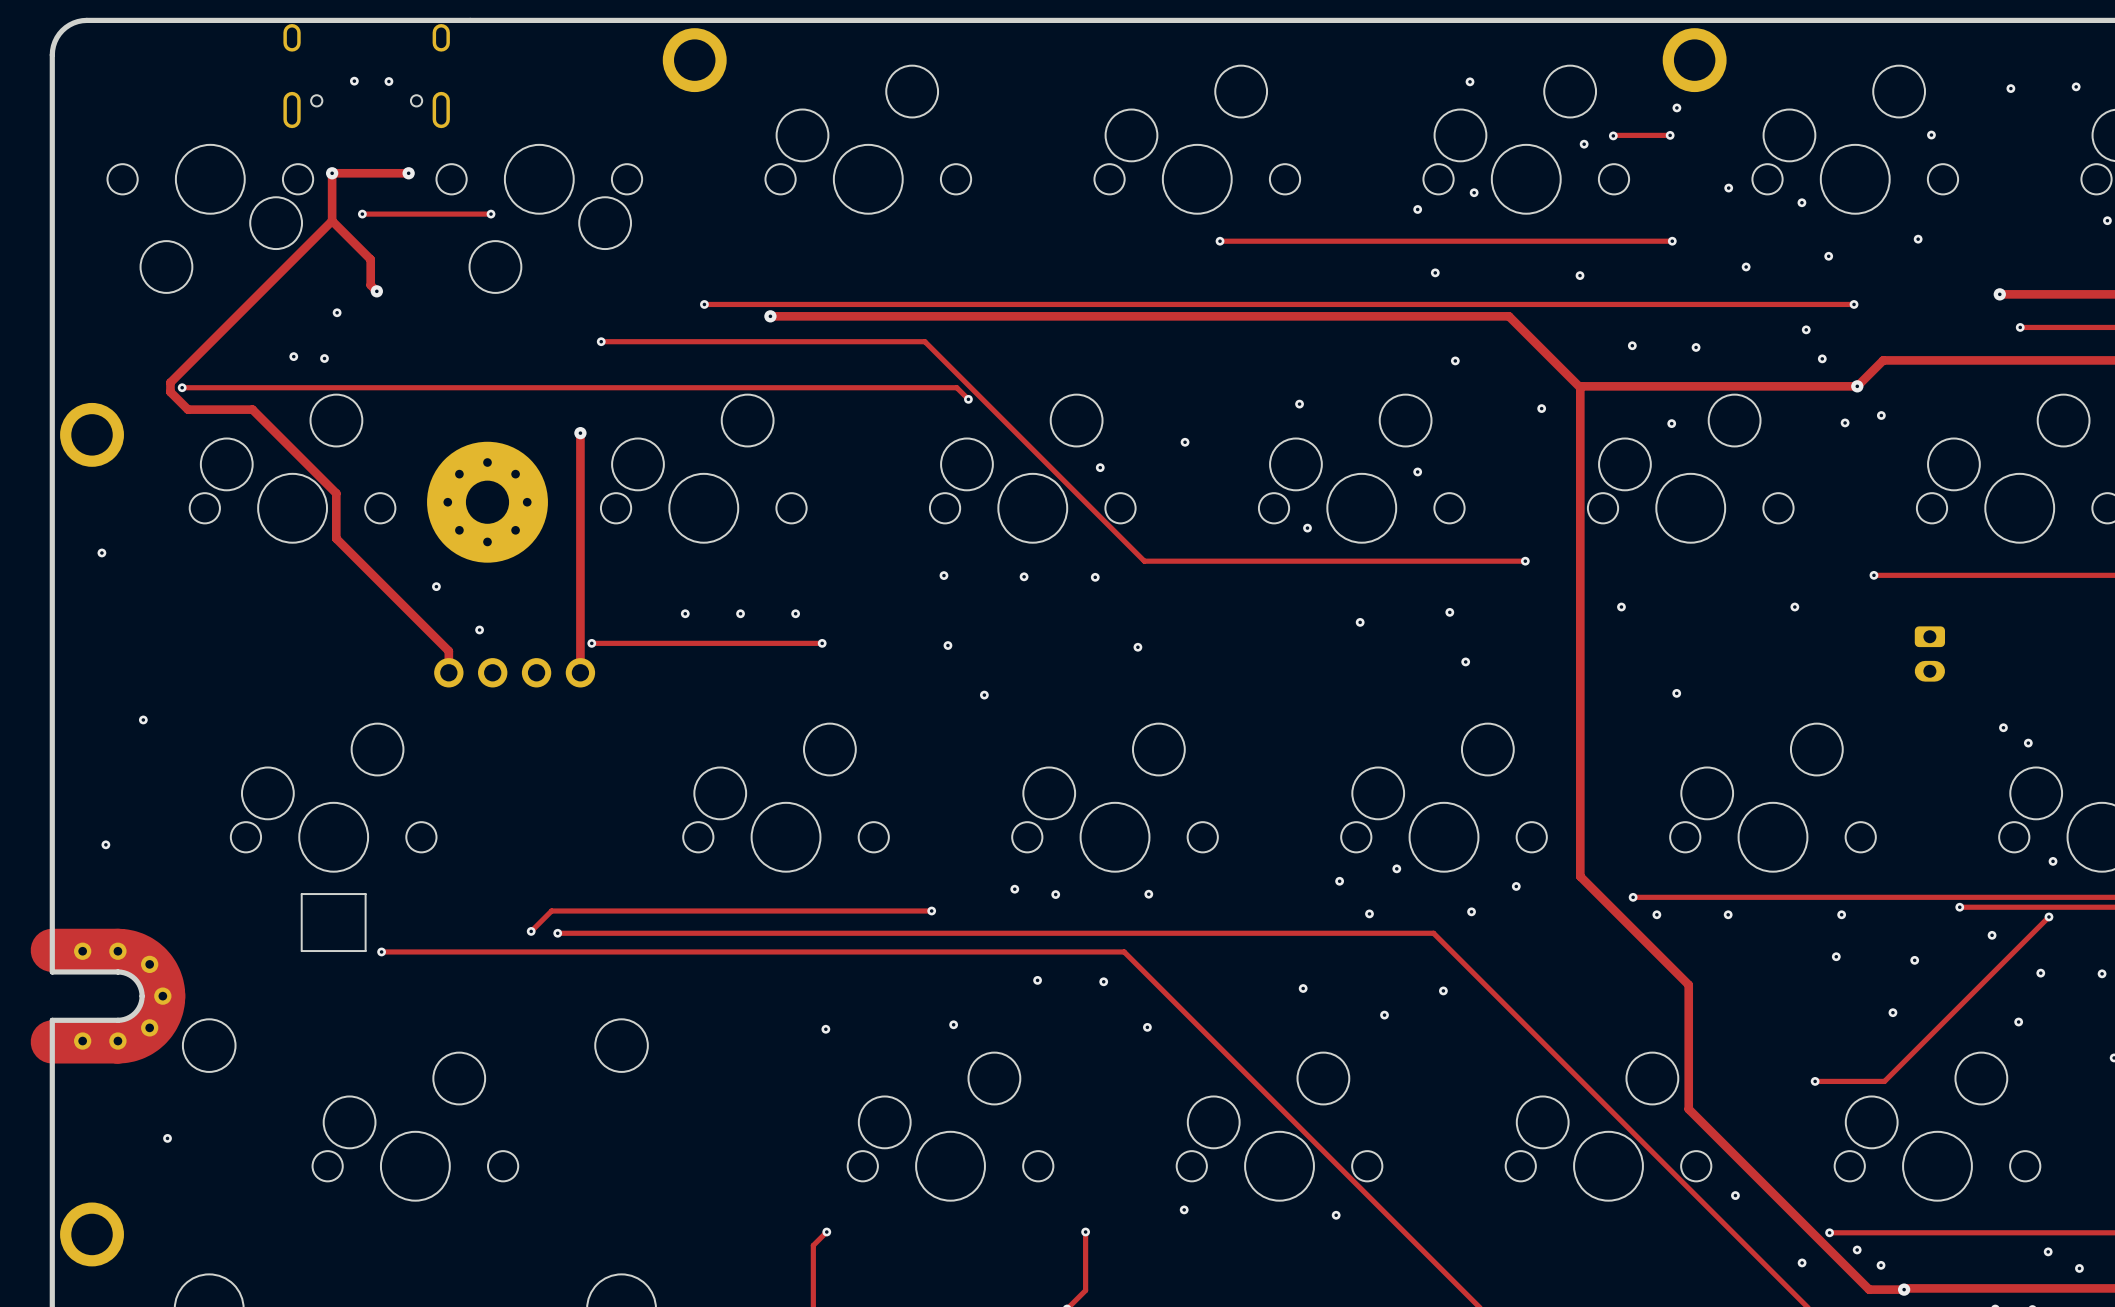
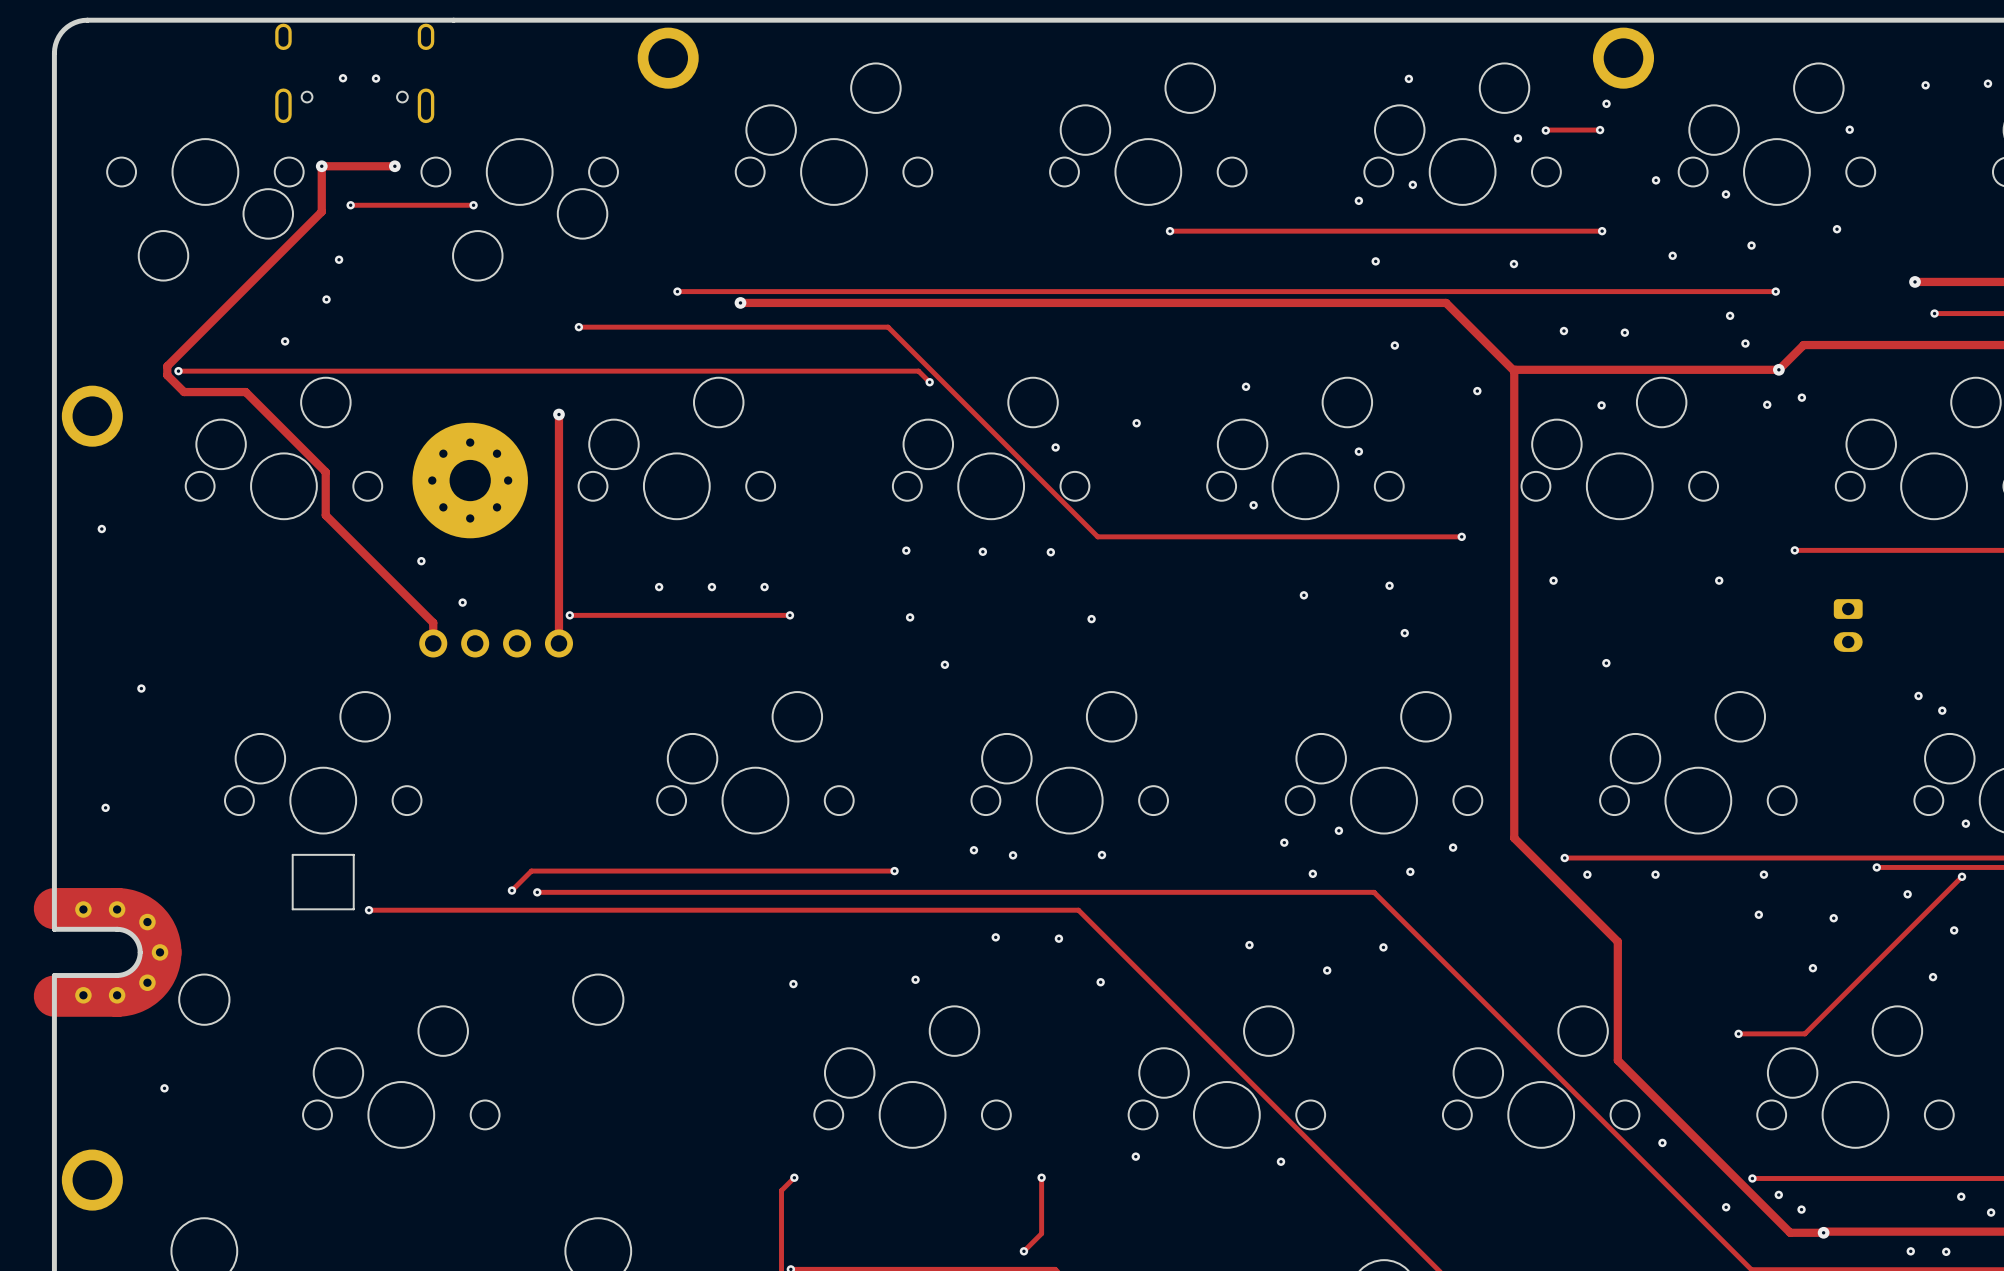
track: (332, 220) (370, 259) (370, 285) (376, 291) -> none
via: (376, 291) -> none
via position: (324, 358) -> (339, 259)

